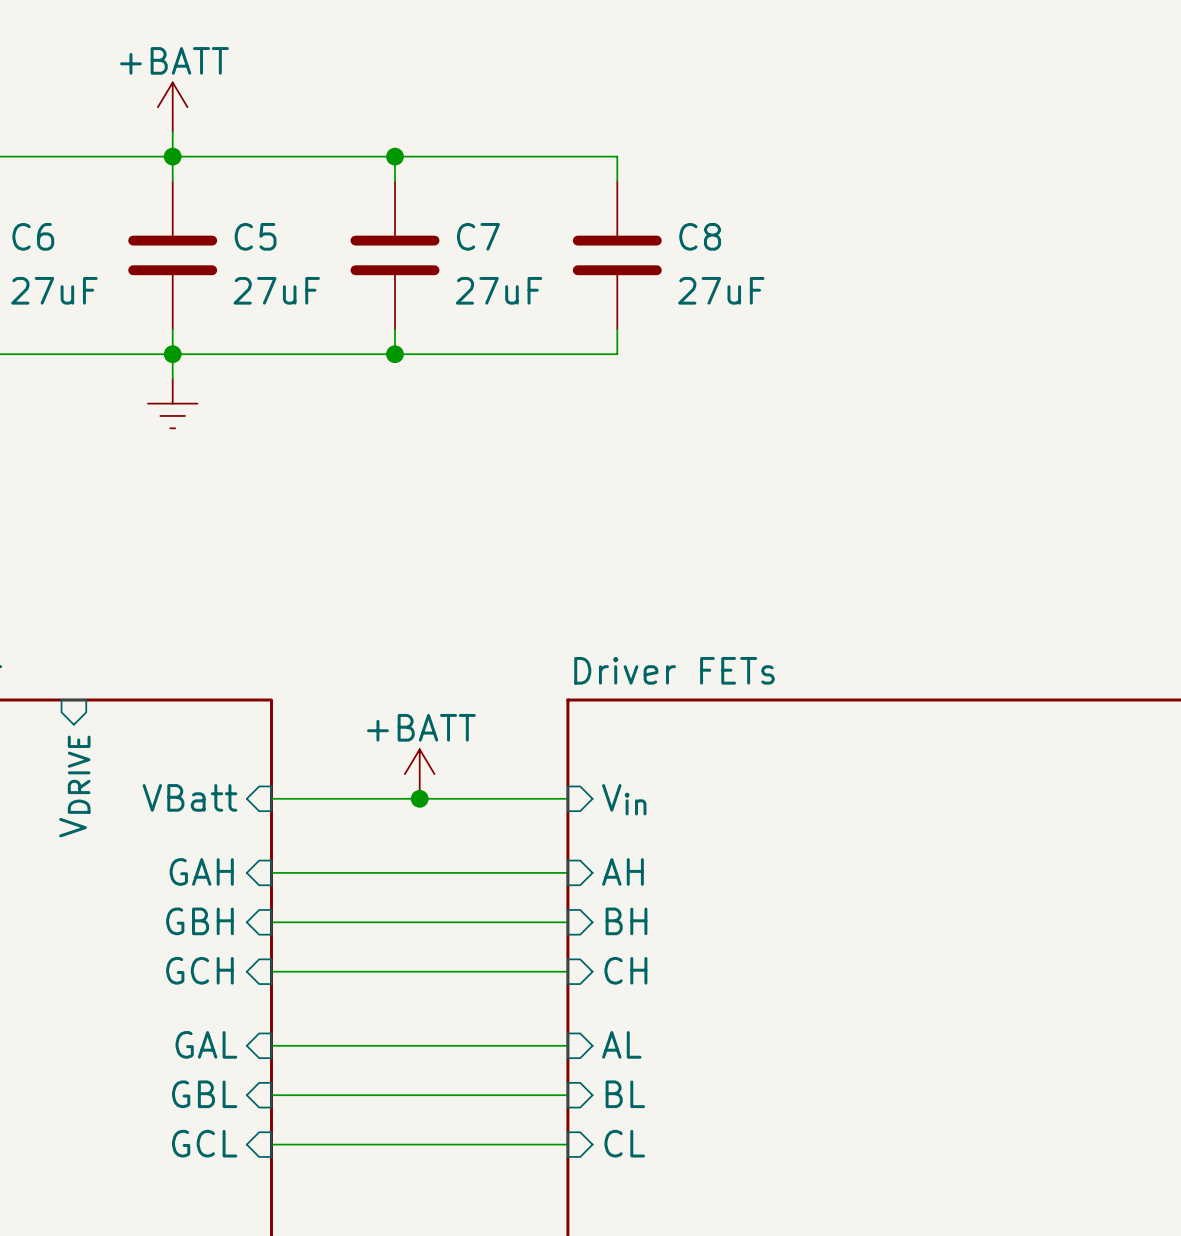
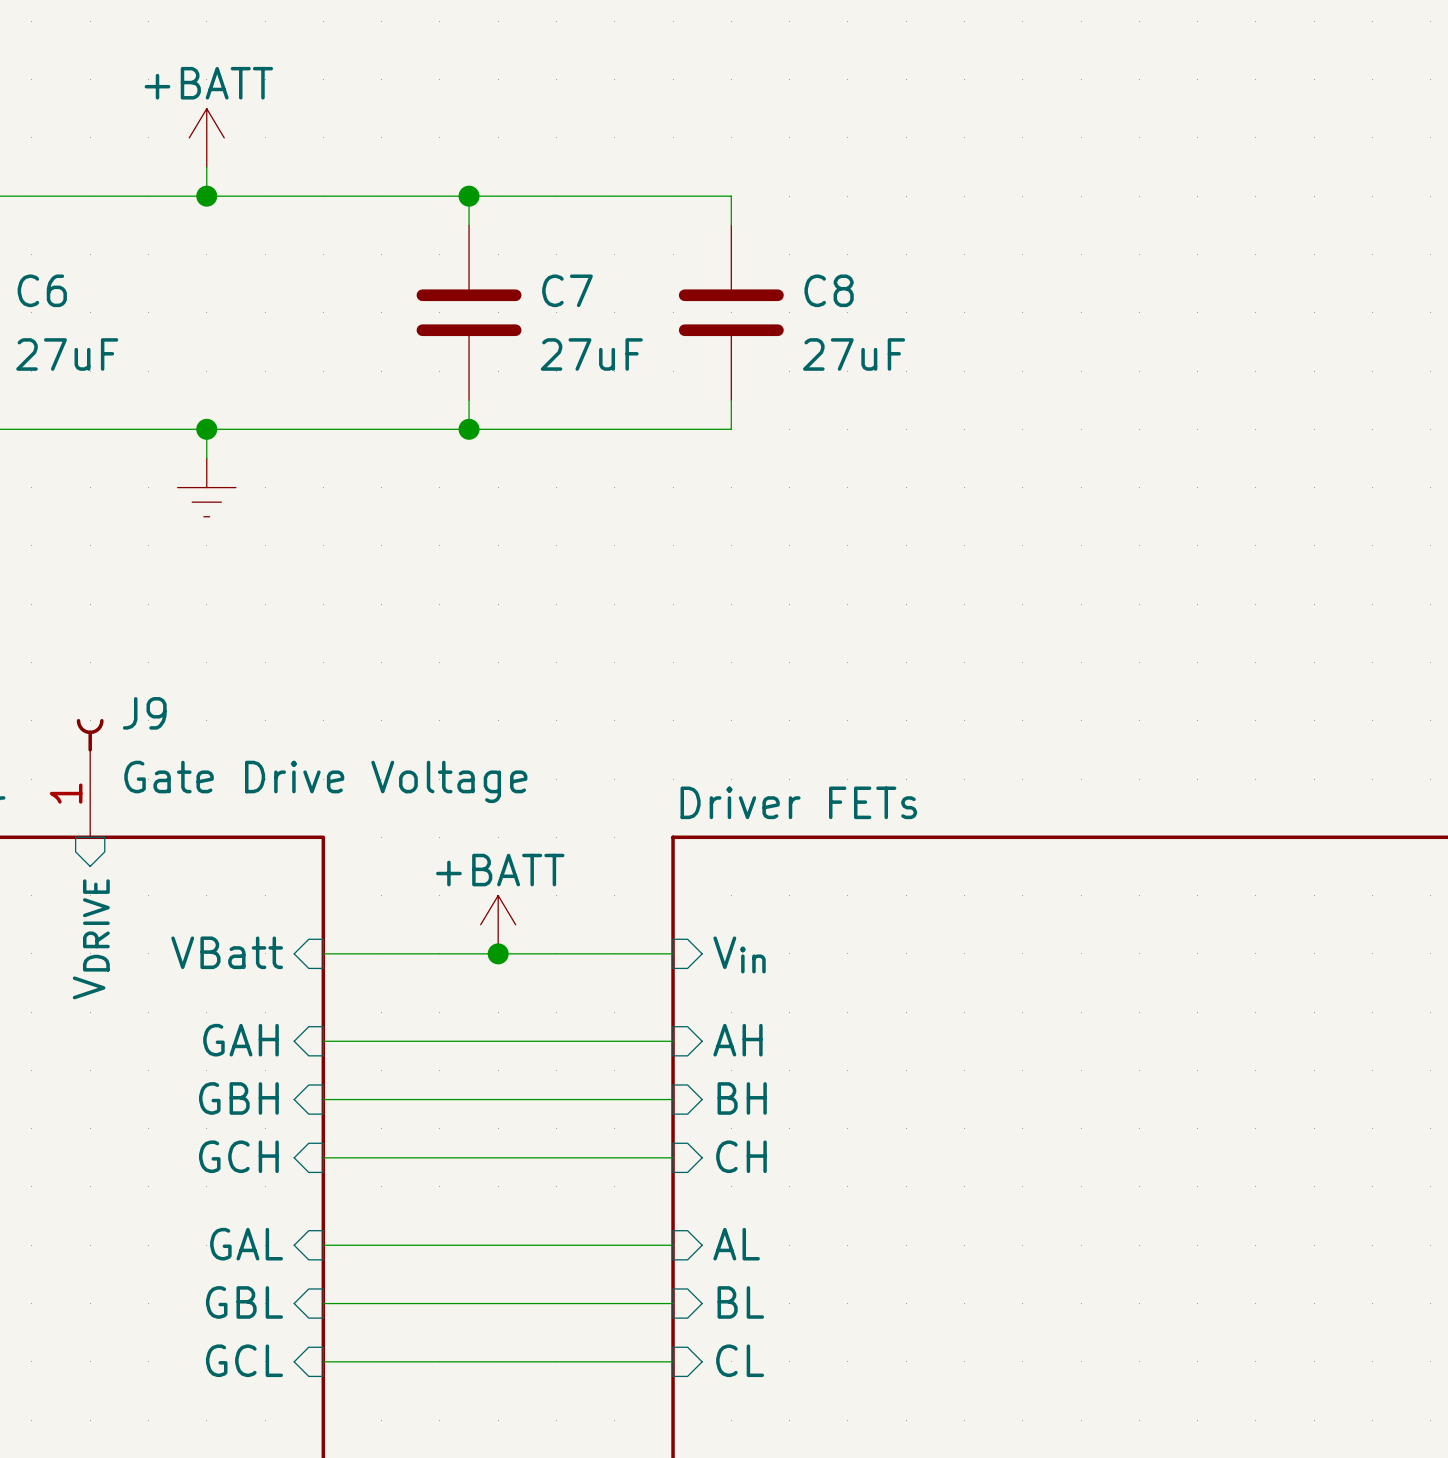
wire: (172, 156) (172, 181) -> none
C5: 27uF (172, 255) -> none
wire: (172, 329) (172, 354) -> none
J9: none -> Gate Drive Voltage (90, 778)

